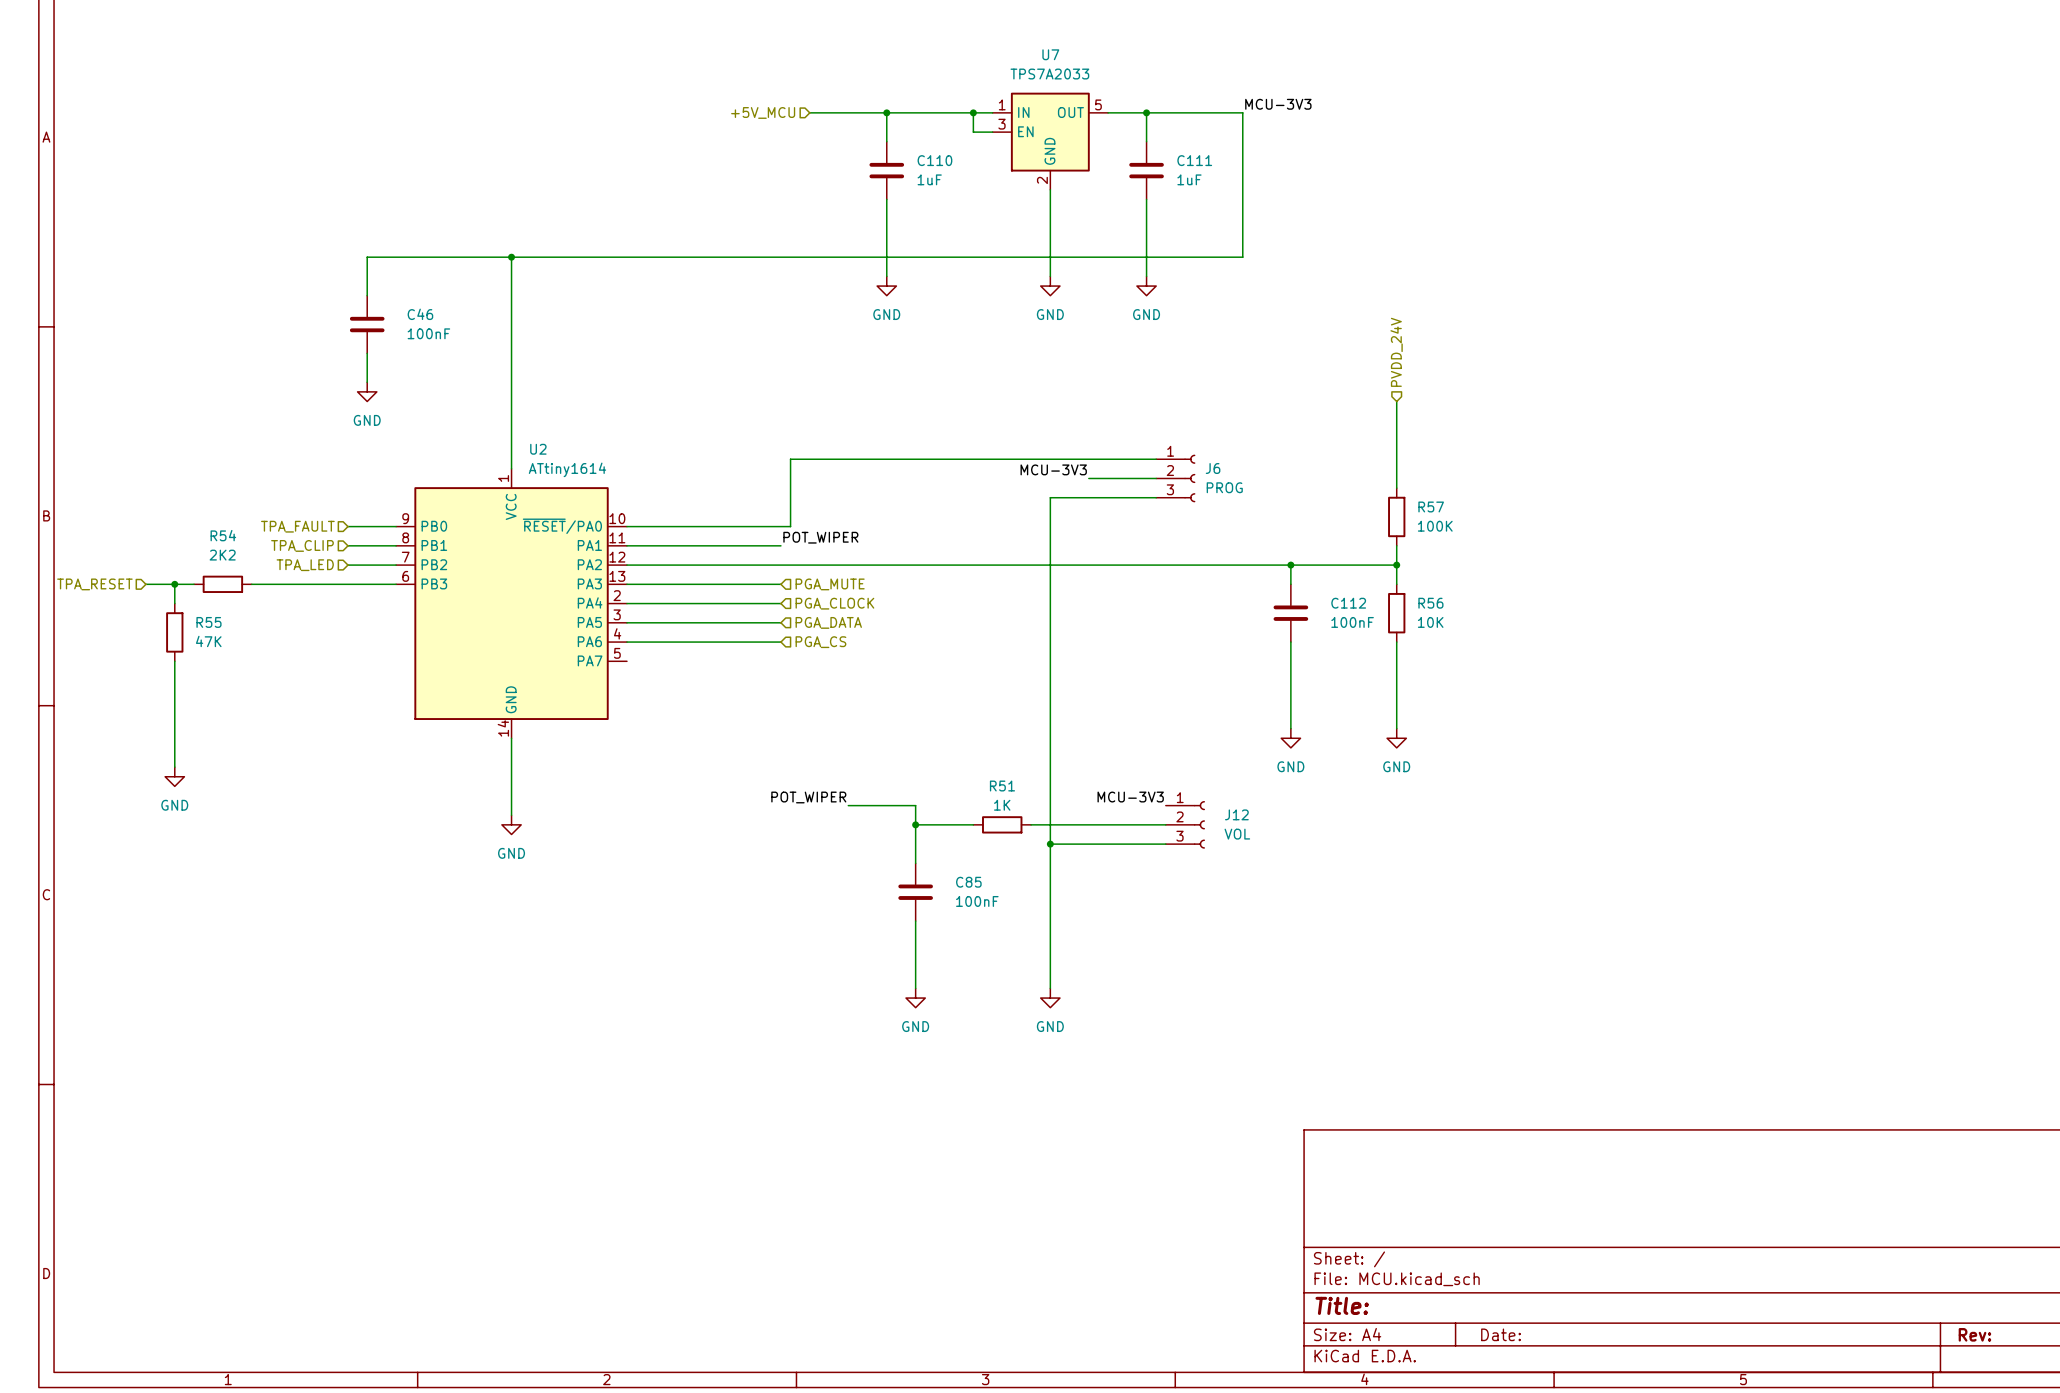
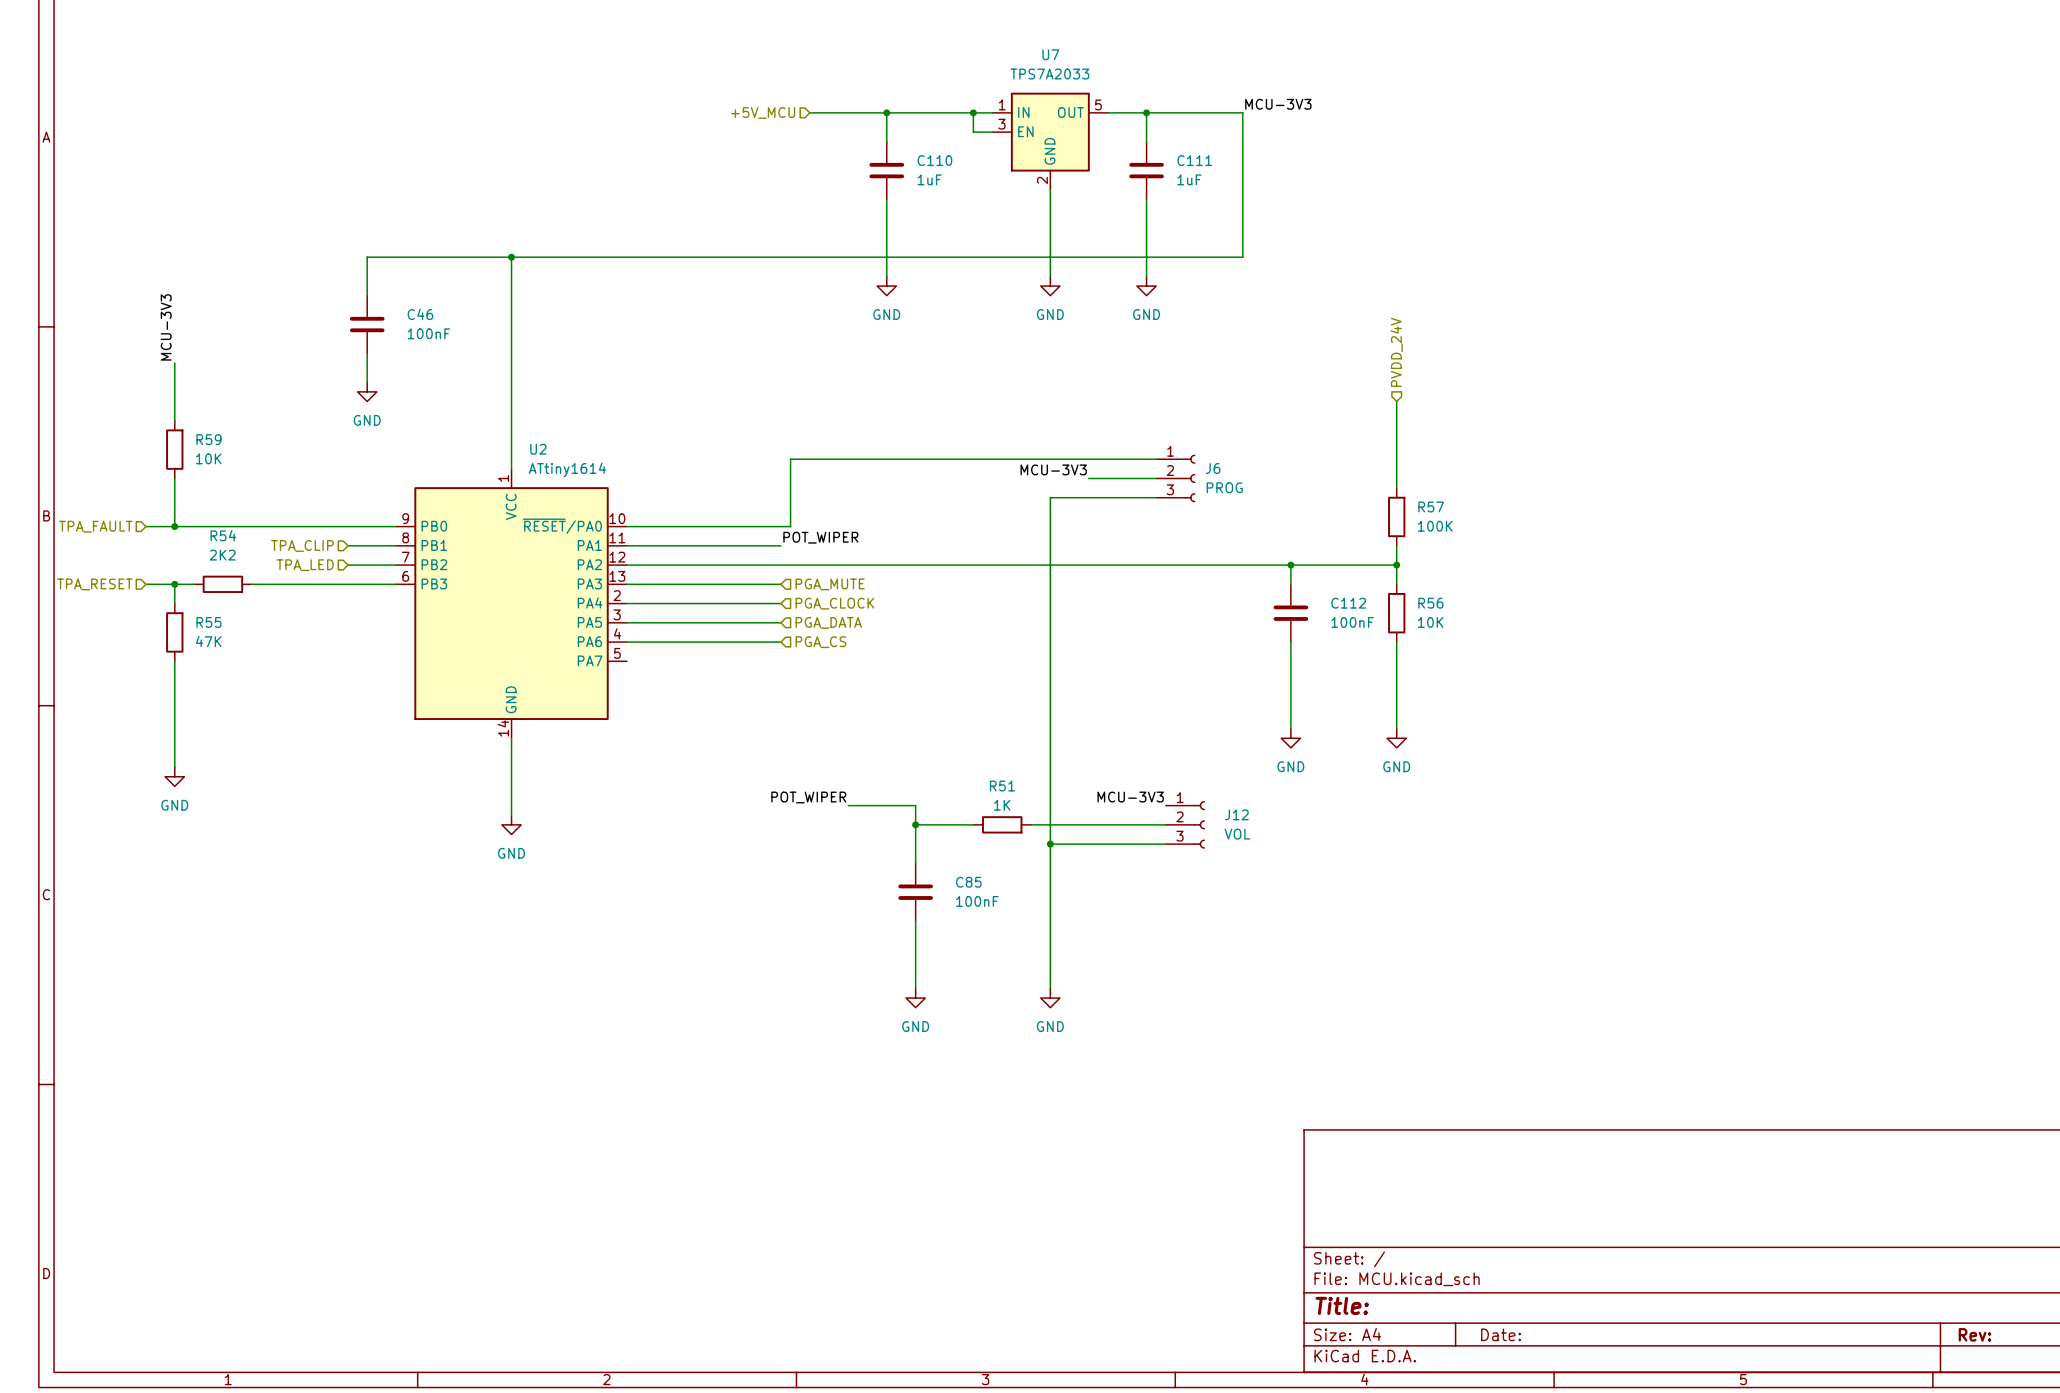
label: none -> MCU-3V3 (166, 327)
wire: none -> (174, 363) (174, 420)
R59: none -> 10K (174, 449)
wire: none -> (174, 478) (174, 526)
hierarchical label: none -> TPA_FAULT (95, 526)
wire: none -> (145, 526) (347, 526)
junction: none -> (174, 526)
hierarchical label: TPA_FAULT (297, 526) -> none

